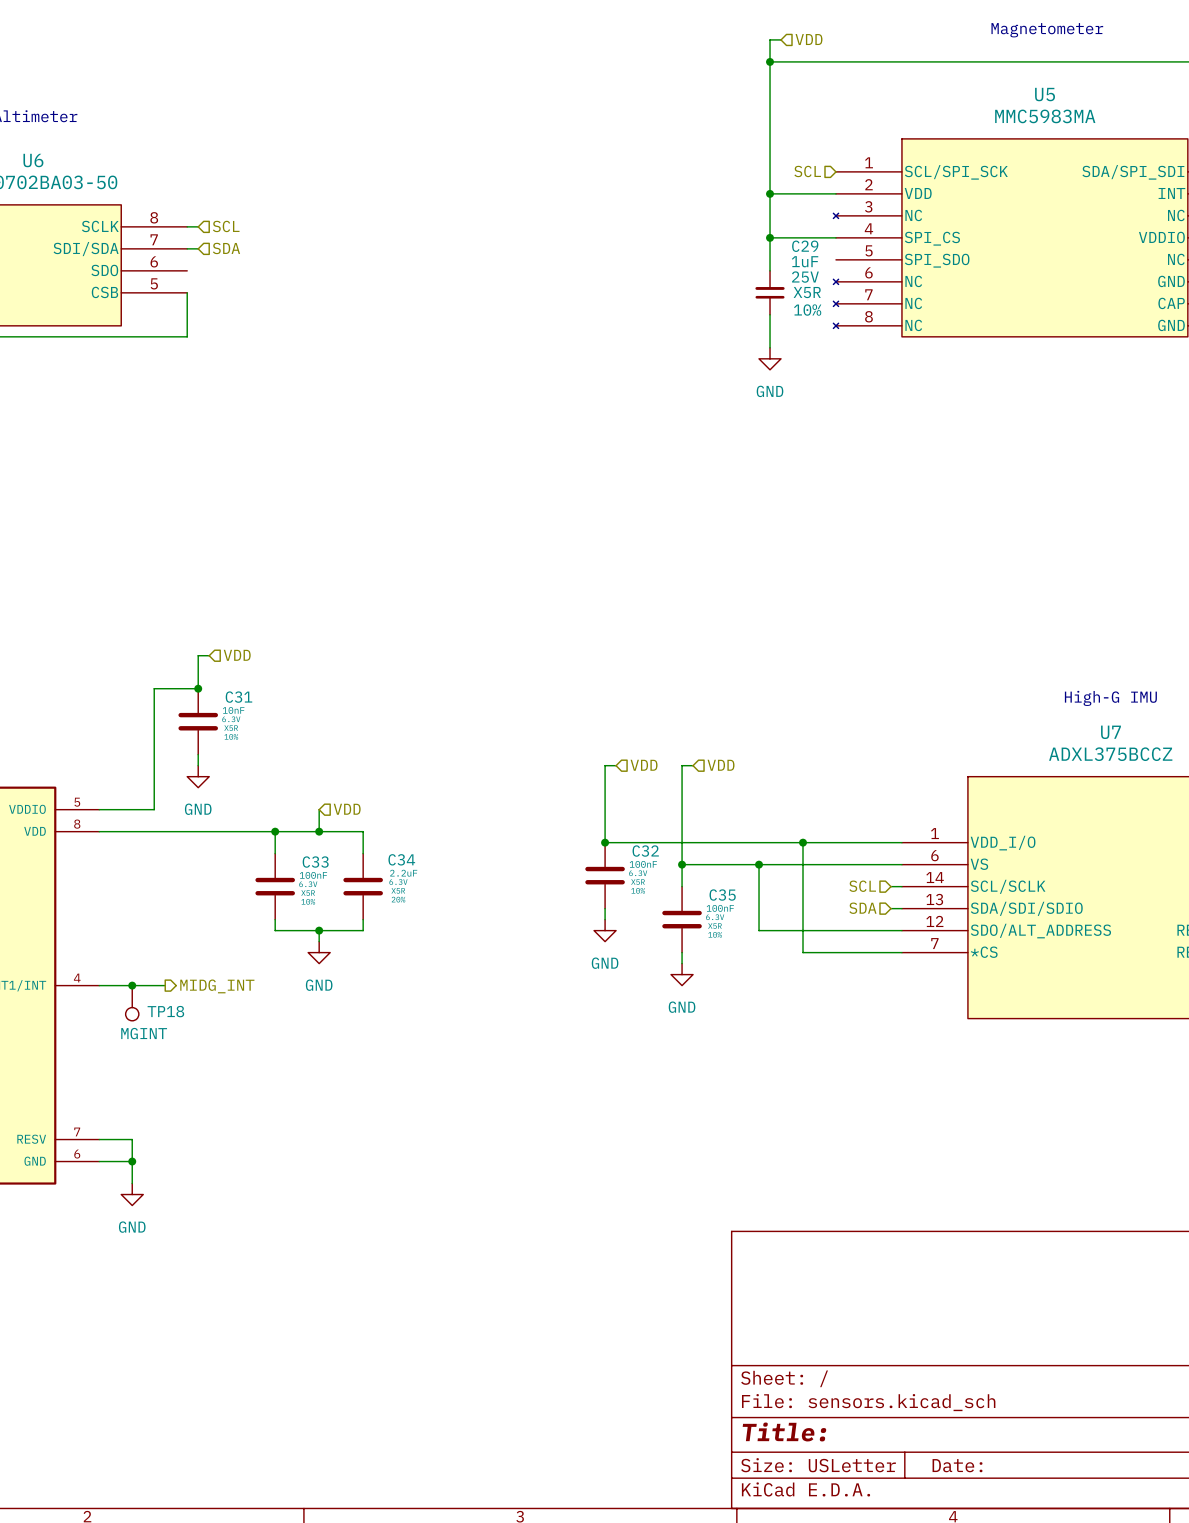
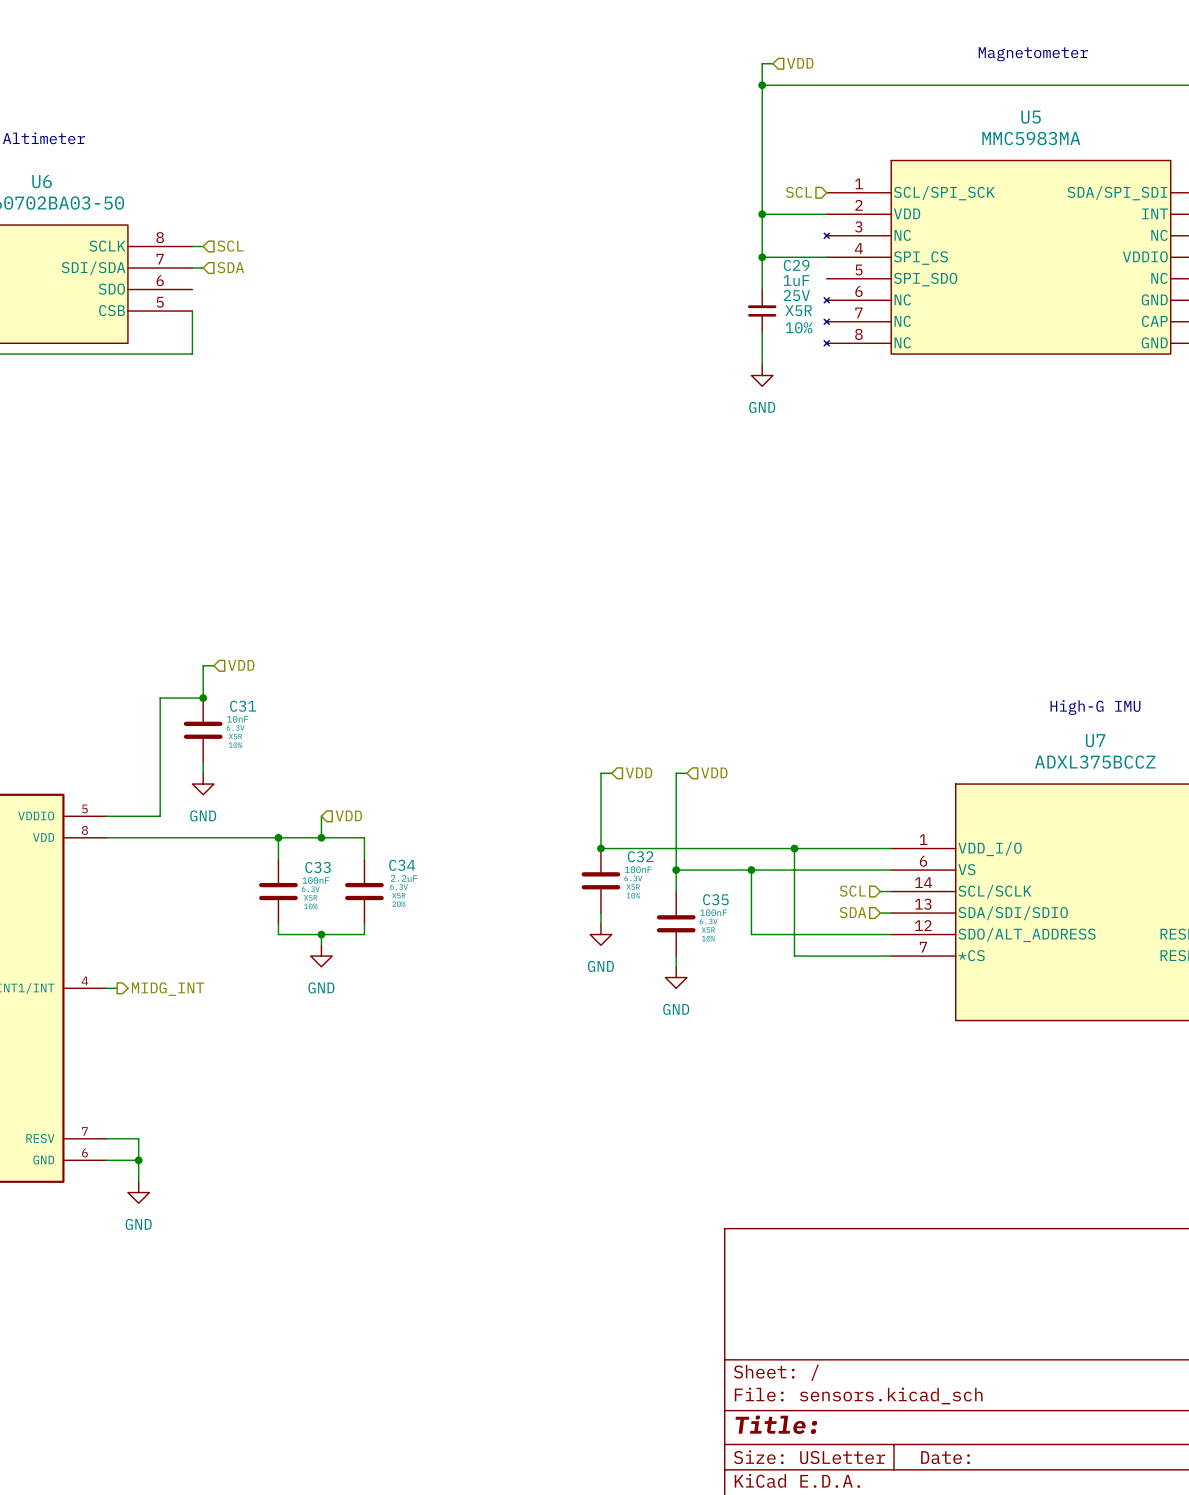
wire: (110, 985) (165, 985) -> none
junction: (132, 985) -> none
hierarchical label position: MIDG_INT (217, 986) -> MIDG_INT (168, 989)
TP18: MGINT (132, 1003) -> none

